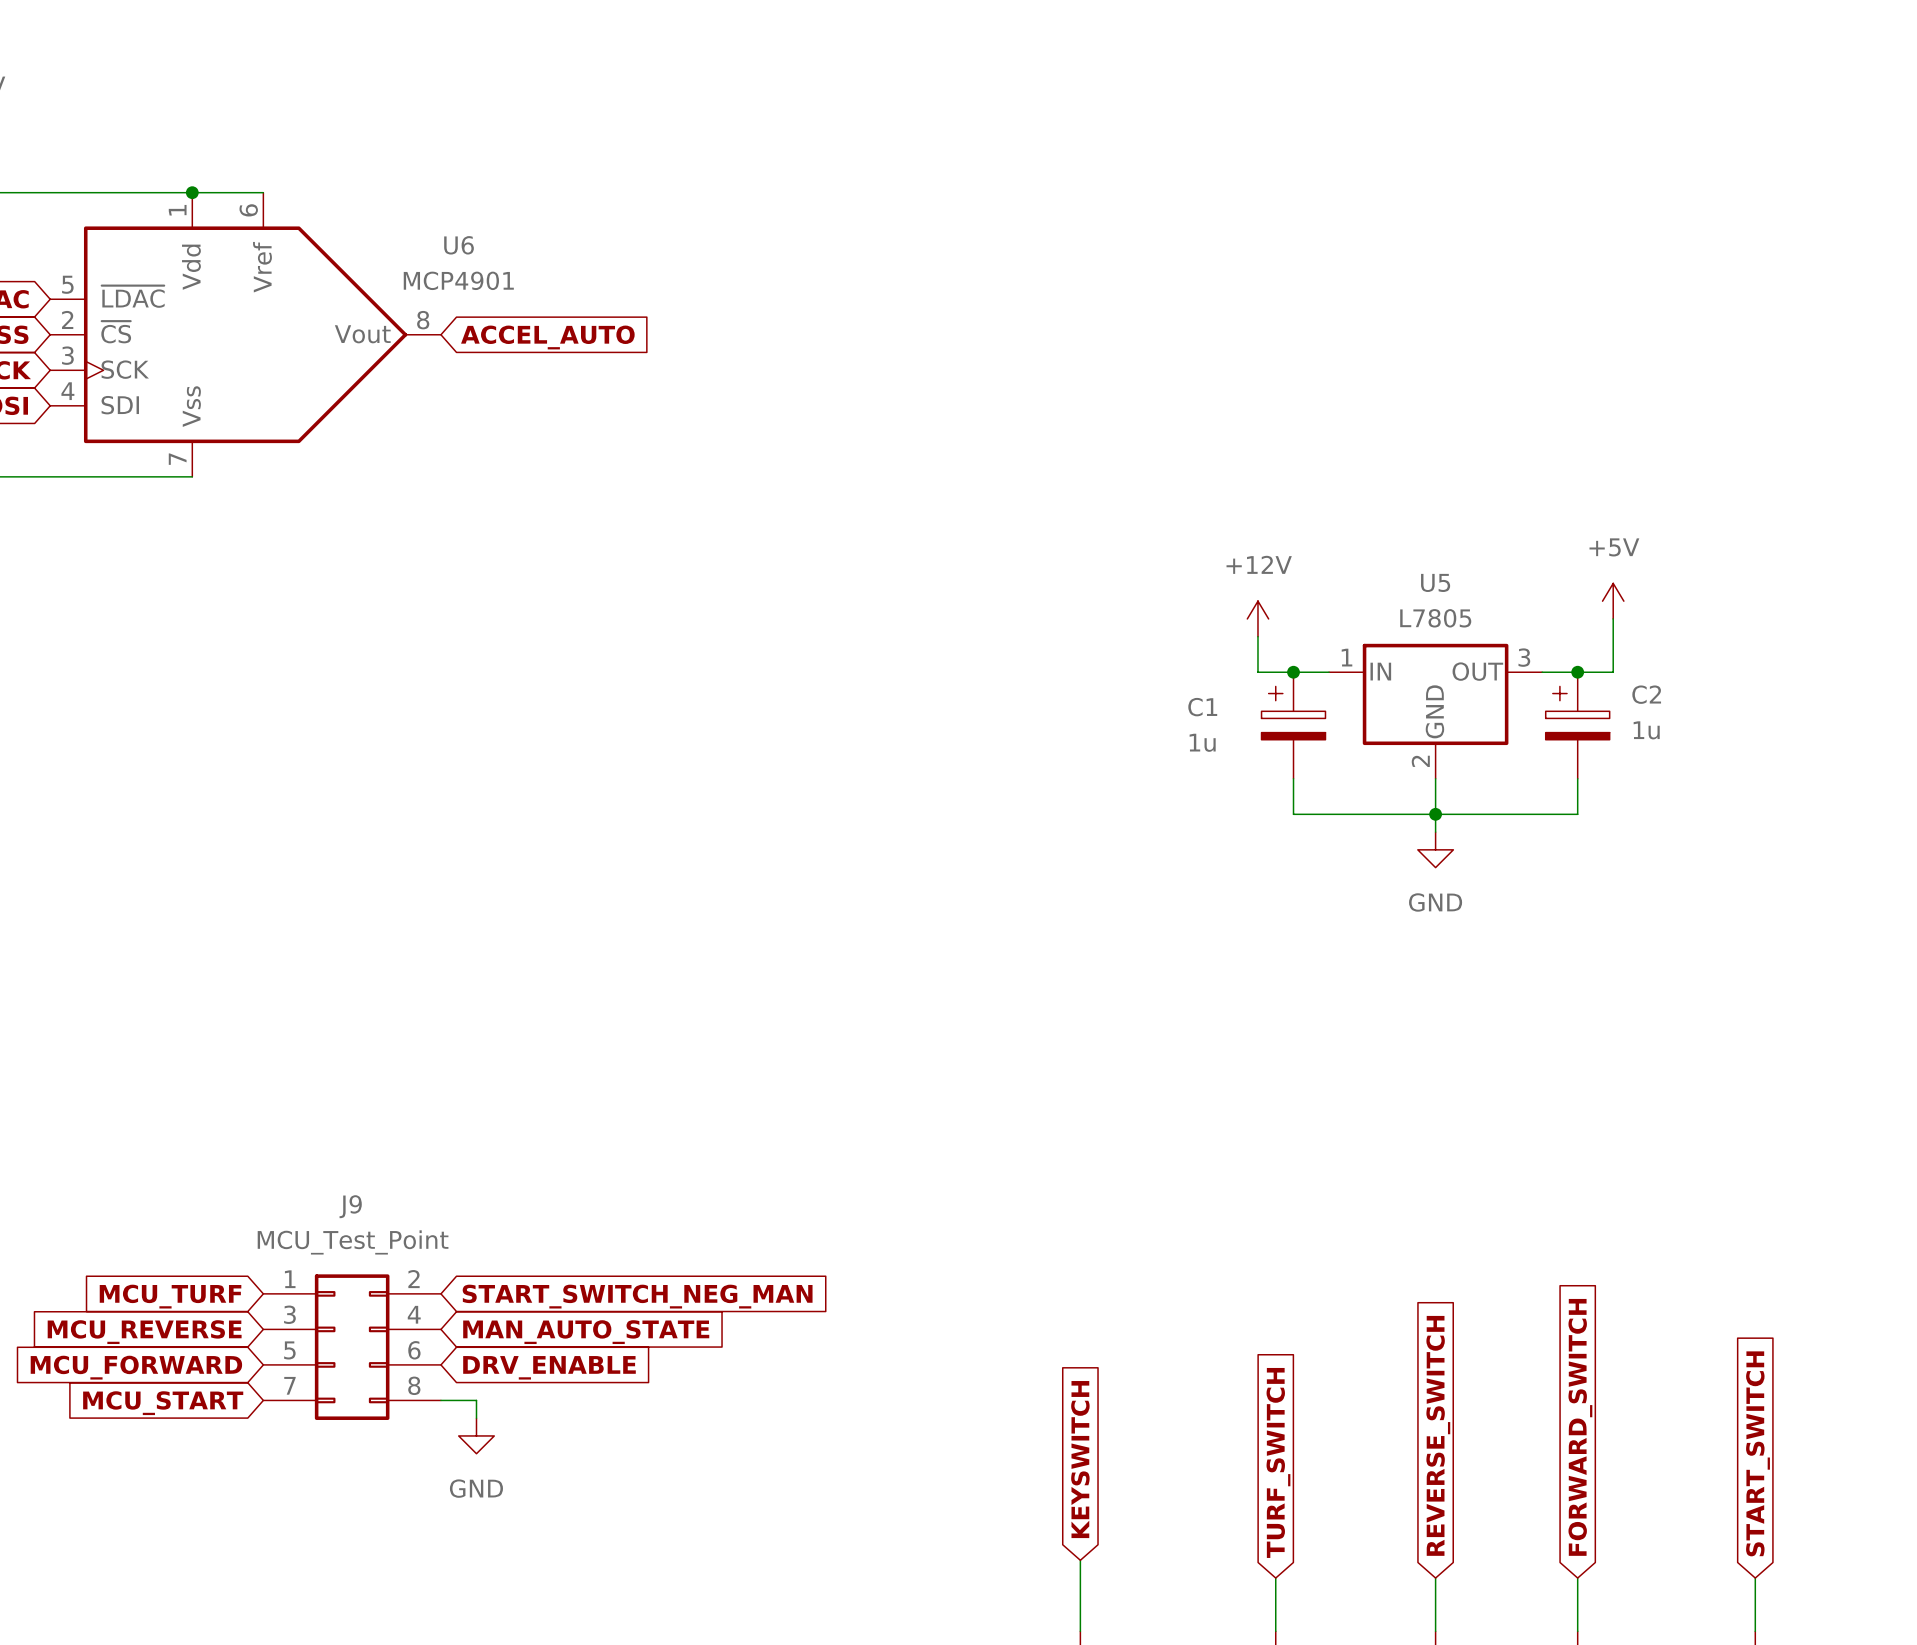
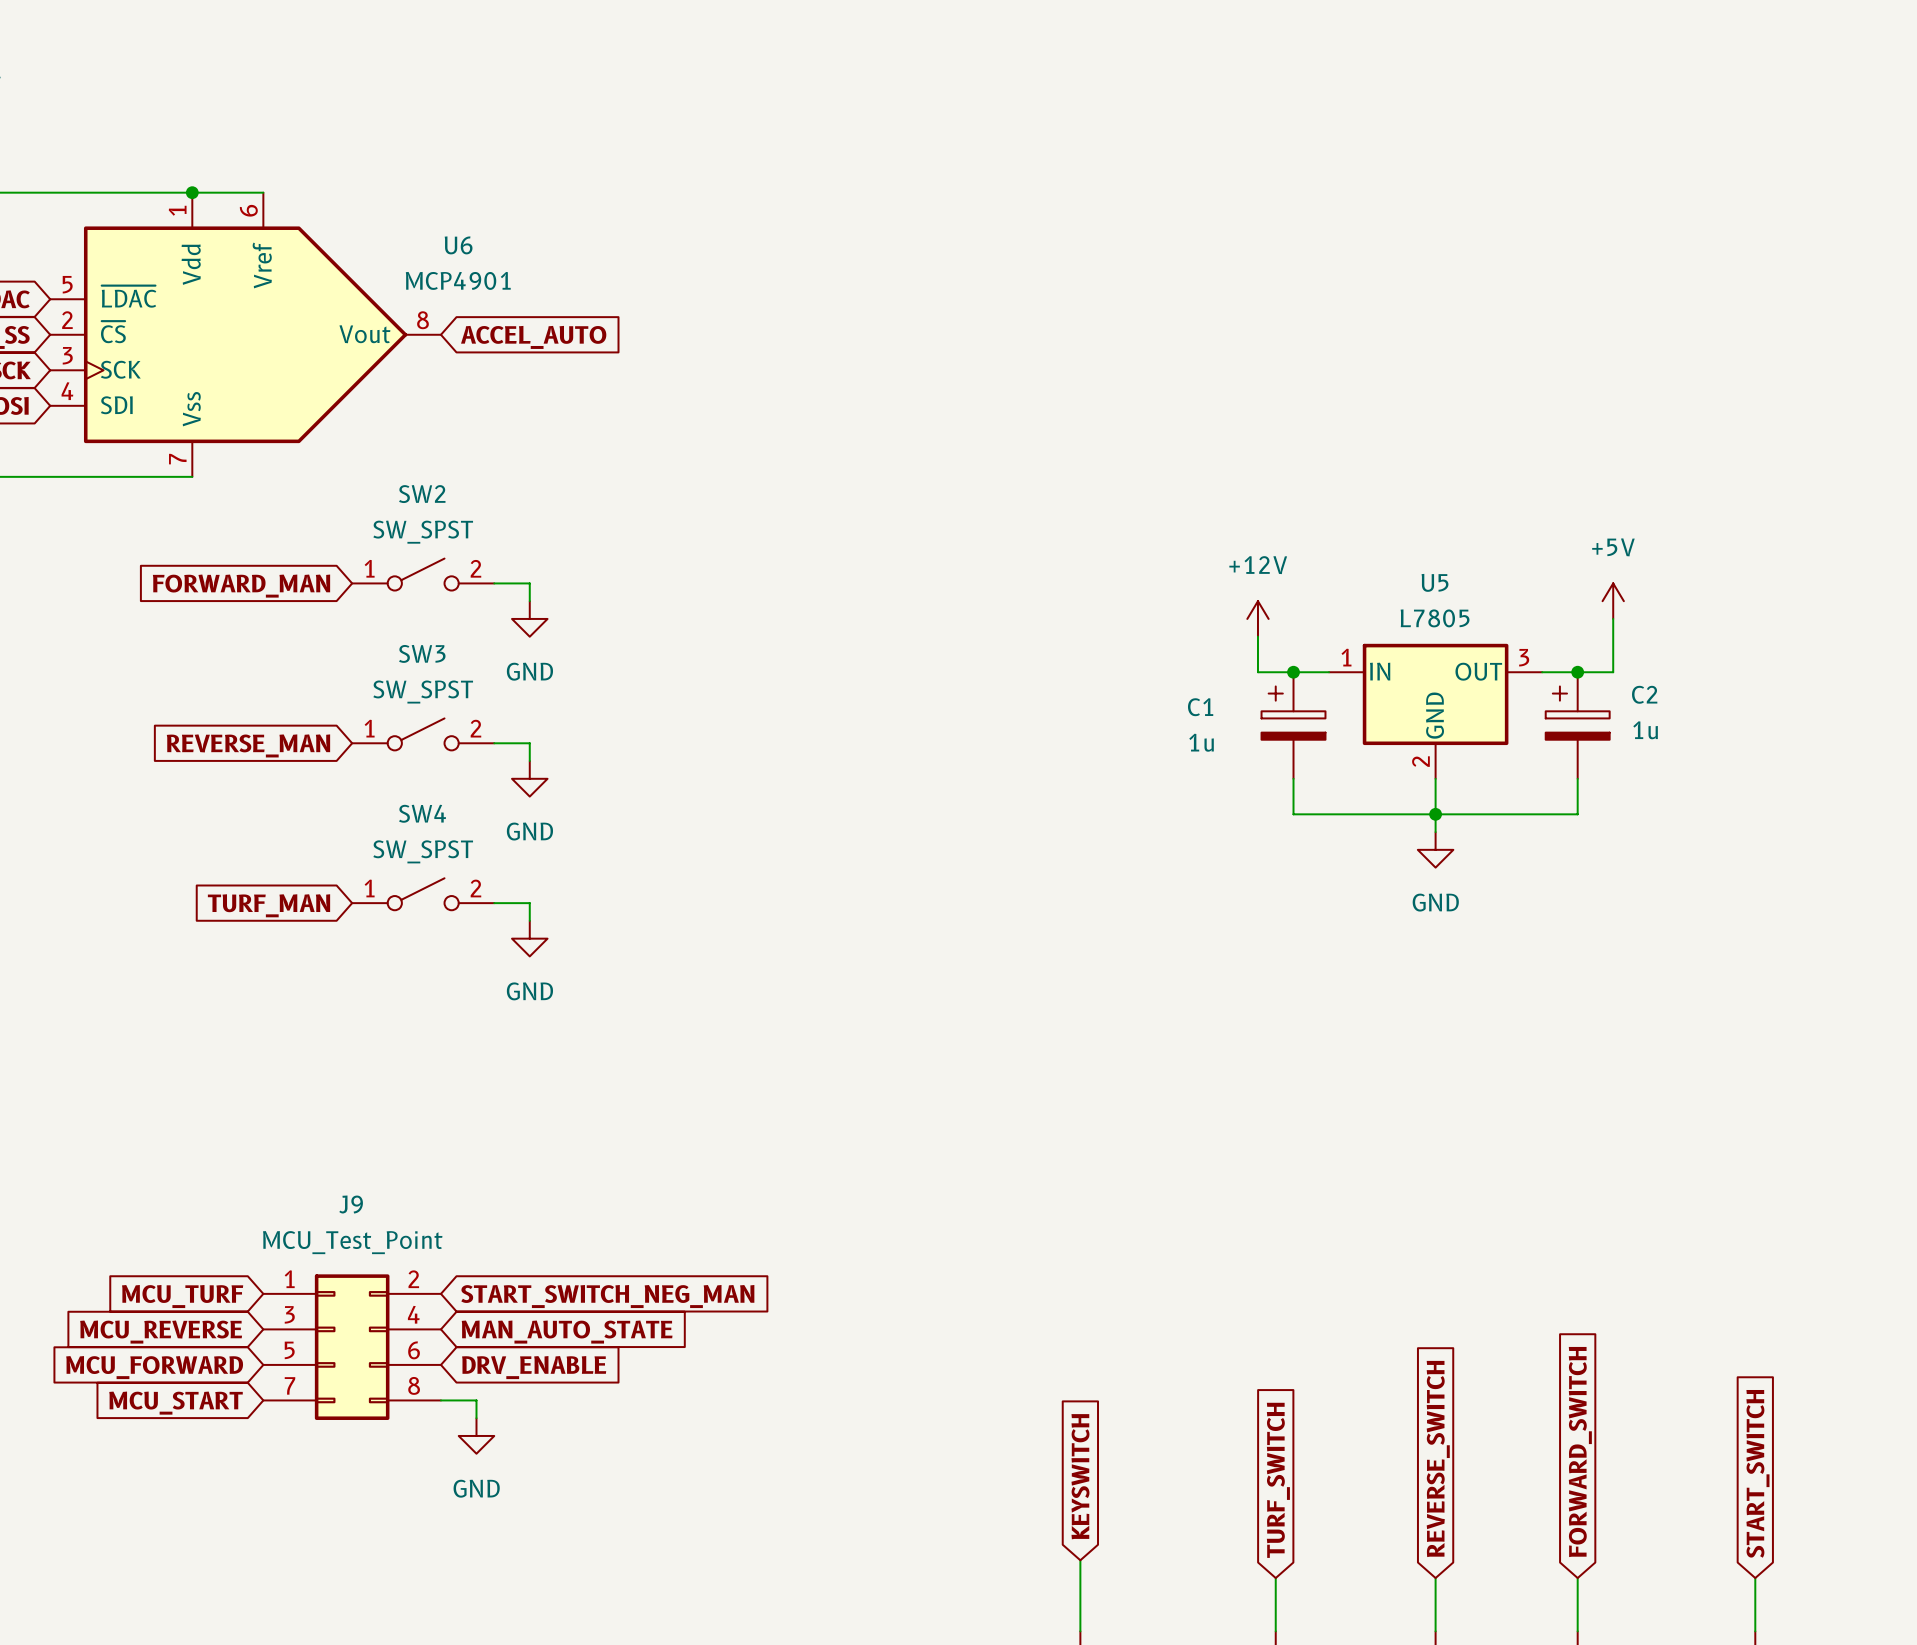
SW2: none -> SW_SPST (423, 574)
wire: none -> (494, 583) (529, 583) (529, 601)
global label: none -> FORWARD_MAN (241, 586)
power symbol: none -> GND (529, 618)
SW3: none -> SW_SPST (423, 734)
wire: none -> (494, 743) (529, 743) (529, 761)
global label: none -> REVERSE_MAN (248, 745)
power symbol: none -> GND (529, 778)
SW4: none -> SW_SPST (423, 894)
wire: none -> (494, 903) (529, 903) (529, 920)
global label: none -> TURF_MAN (269, 905)
power symbol: none -> GND (529, 938)

